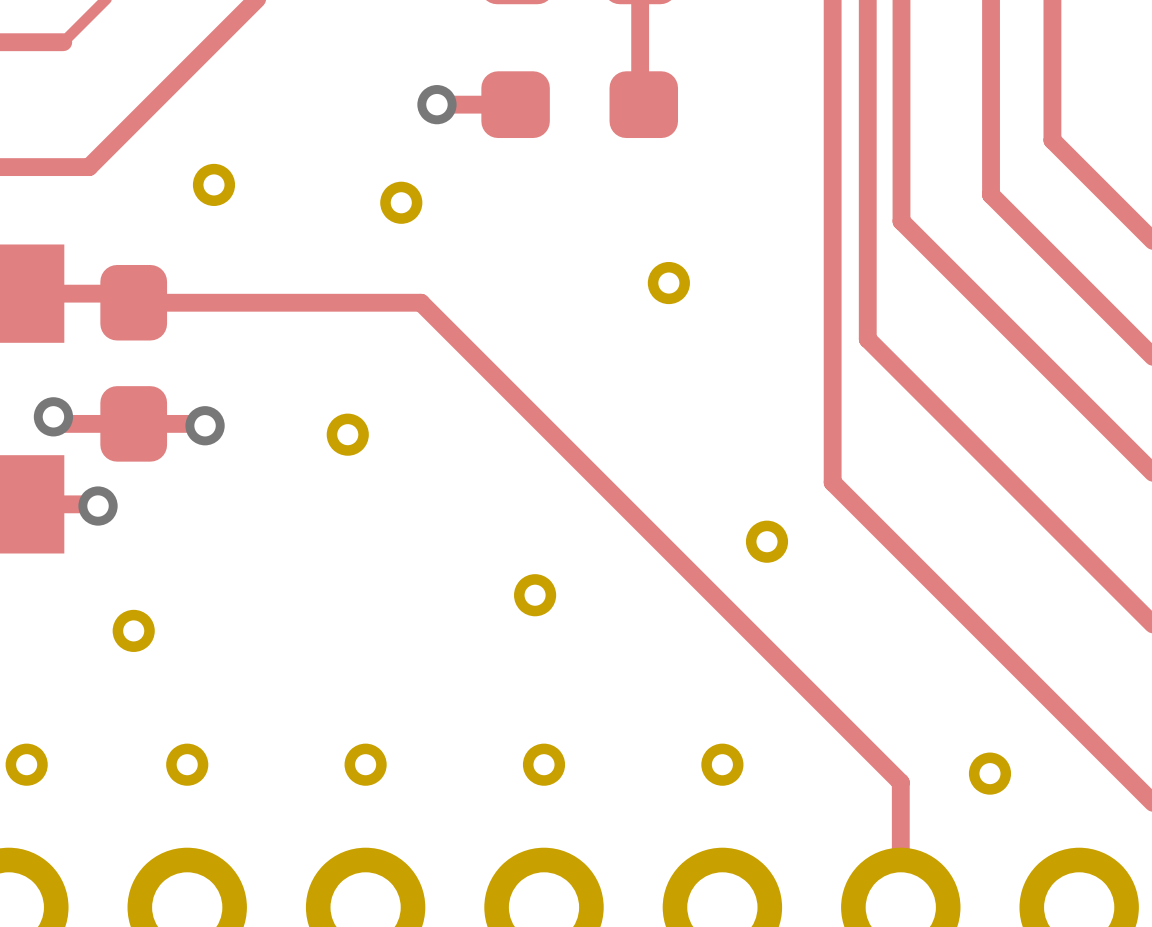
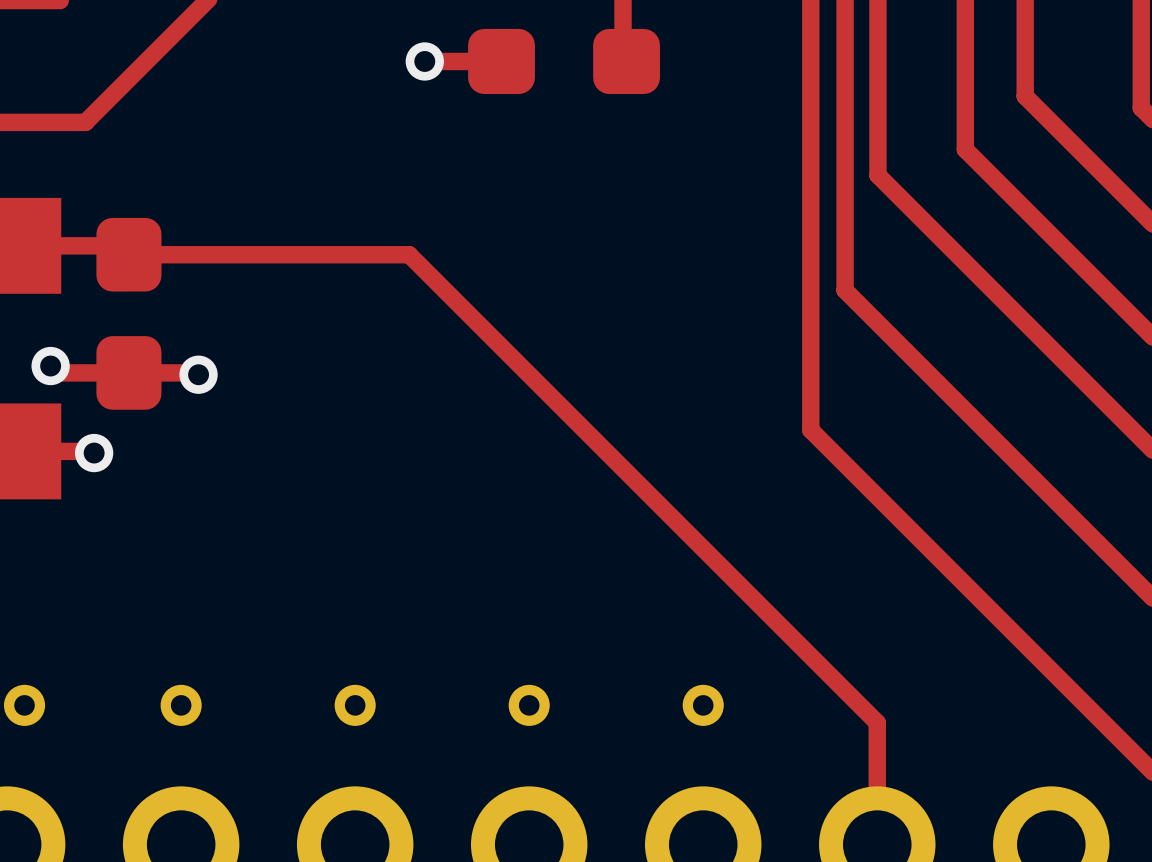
part: (213, 184) -> none
part: (401, 202) -> none
part: (668, 283) -> none
part: (347, 434) -> none
part: (766, 541) -> none
part: (535, 595) -> none
part: (133, 630) -> none
part: (989, 773) -> none

